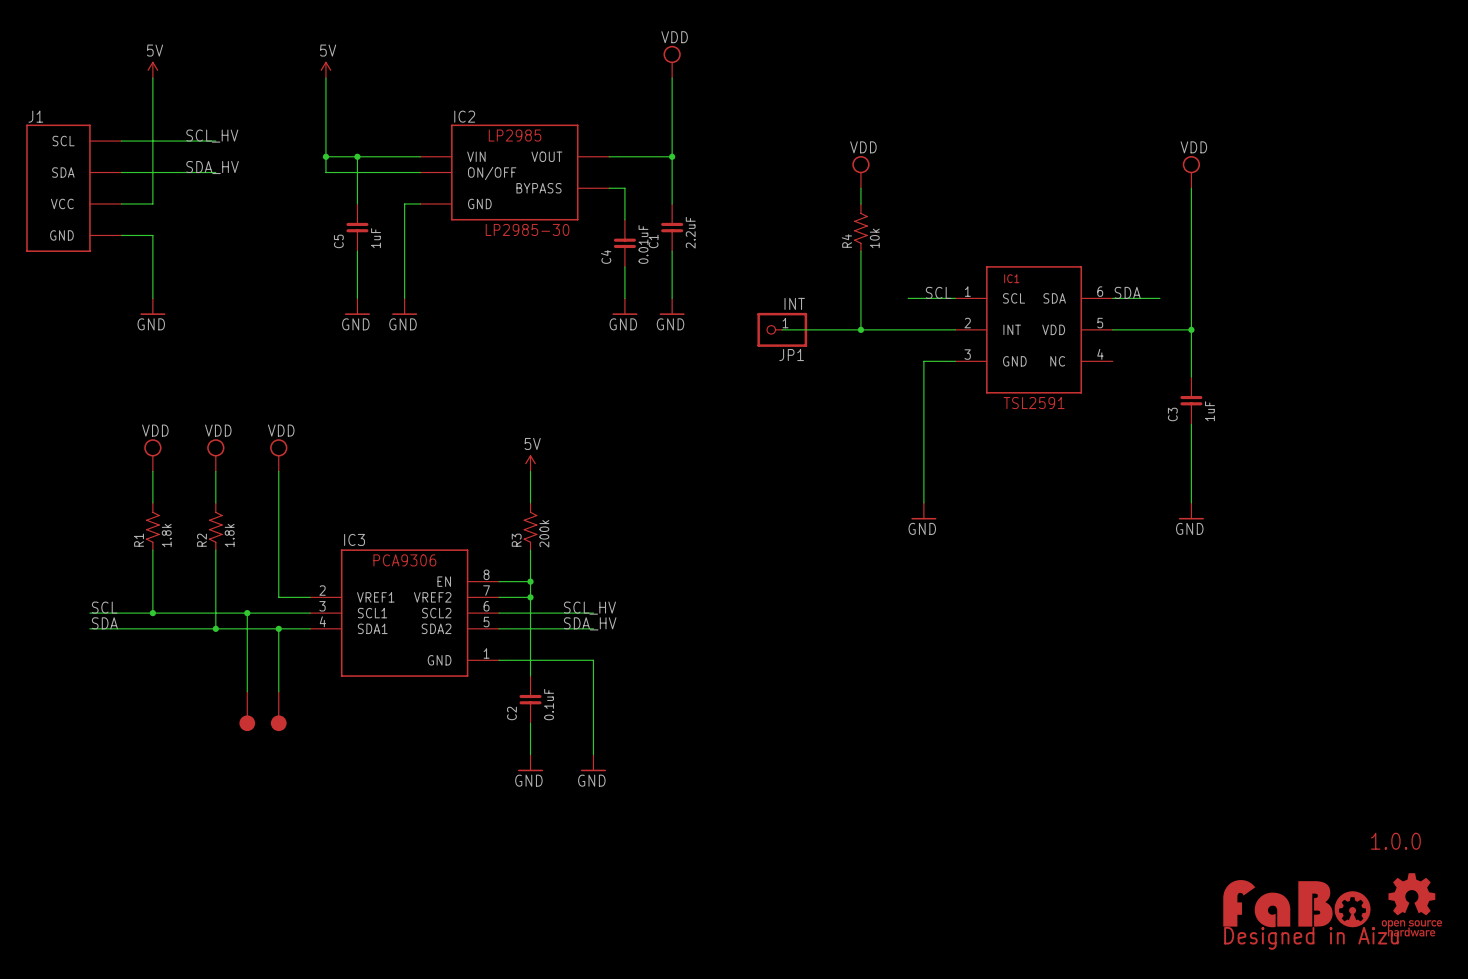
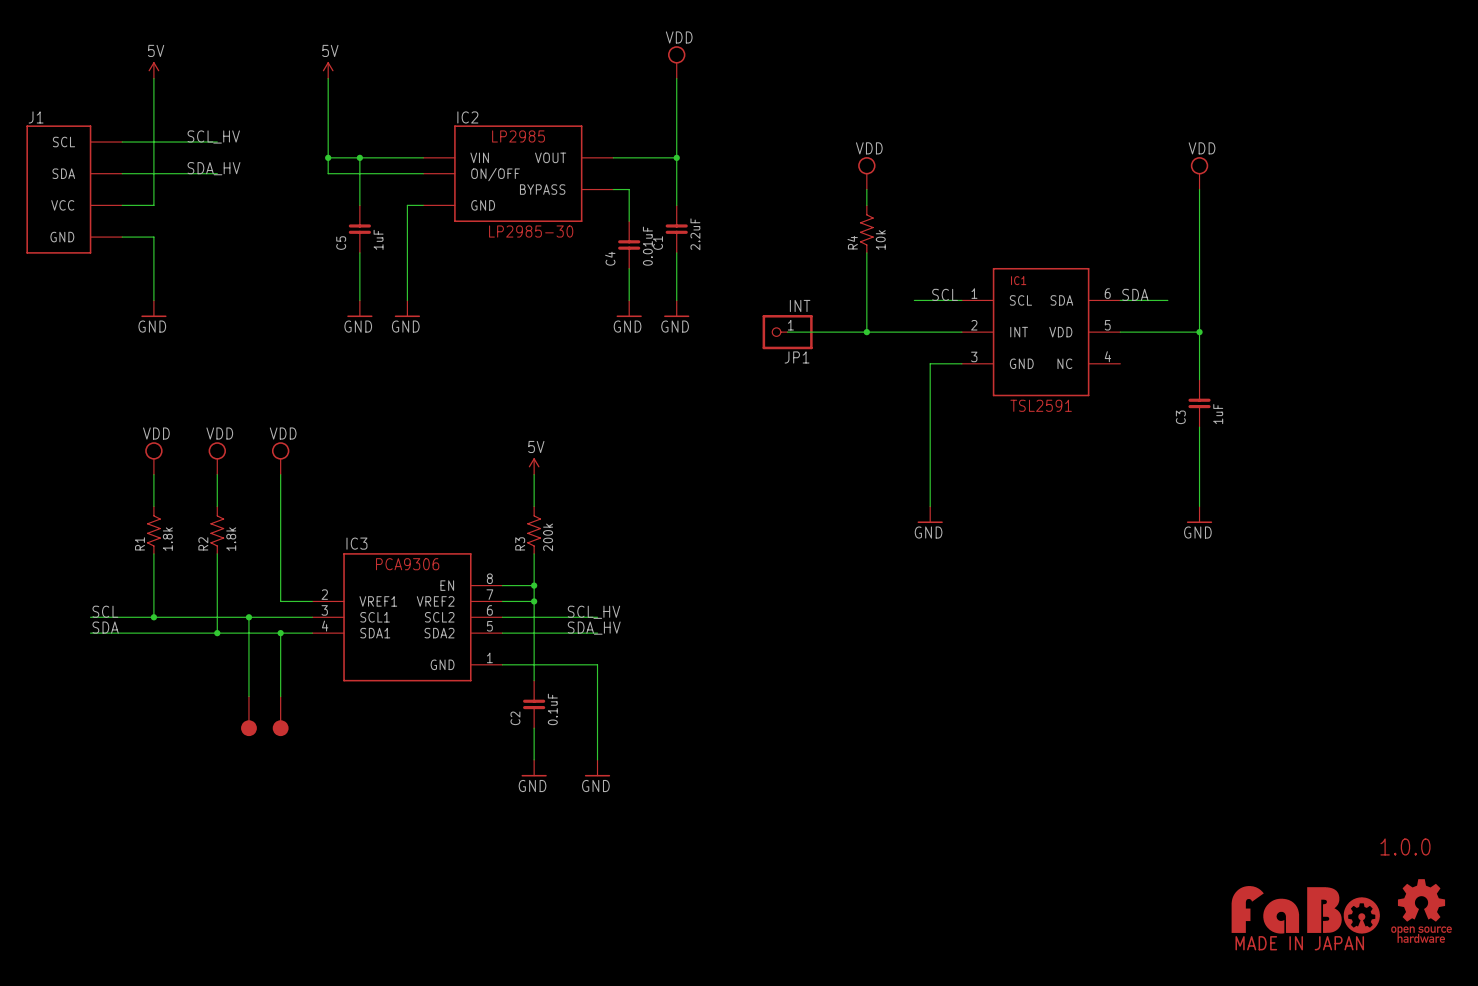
part text: none -> MADE IN JAPAN (1299, 943)
part text: Designed in Aizu (1311, 938) -> none

